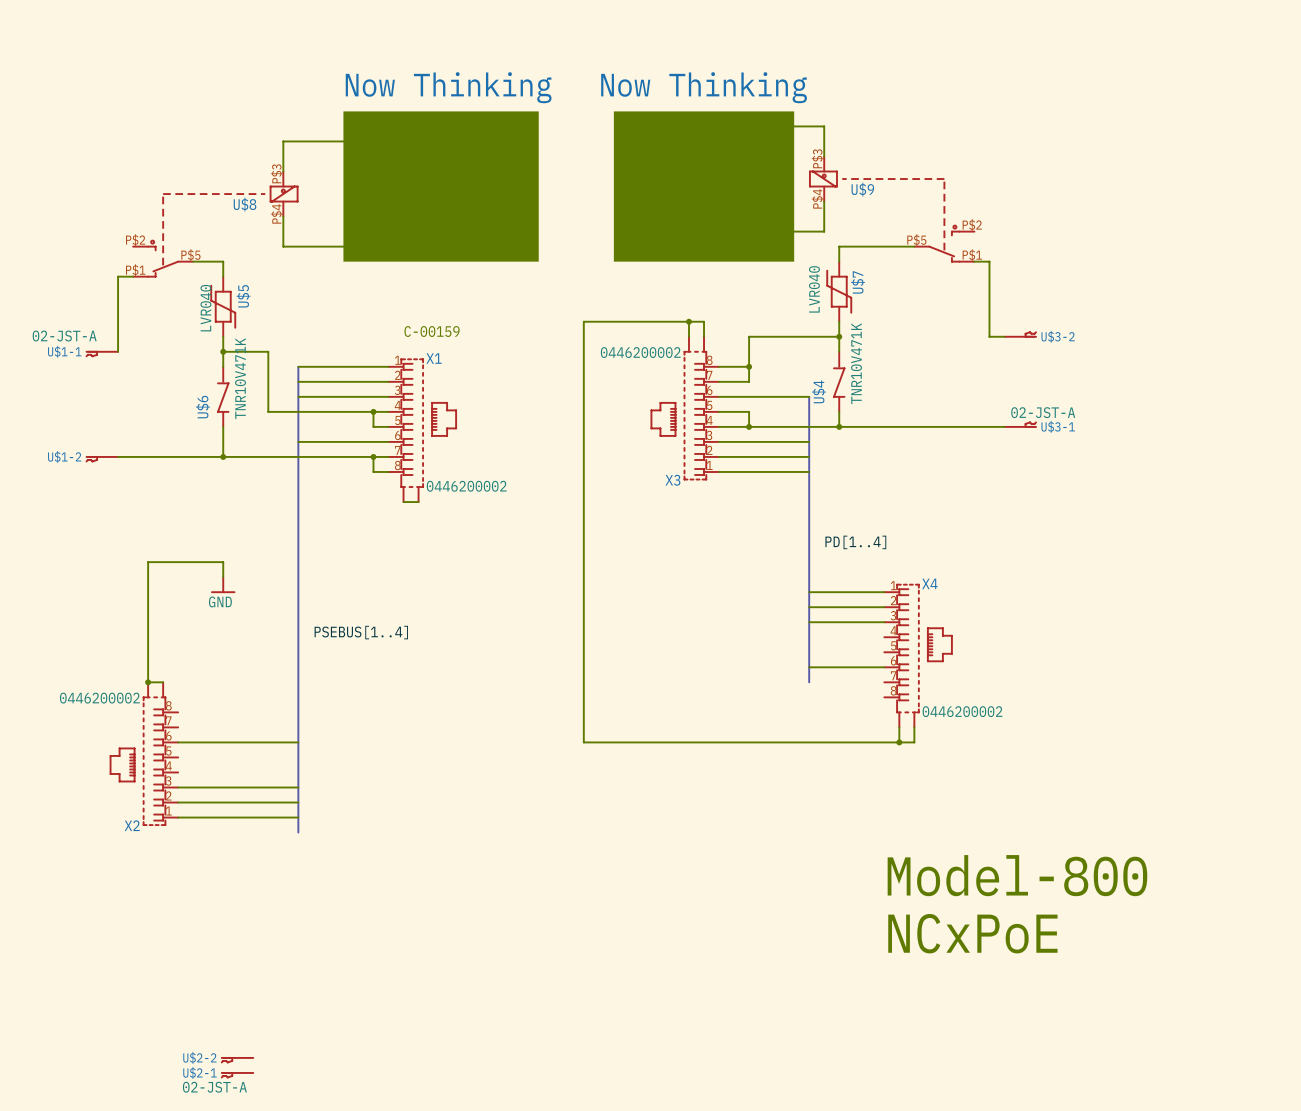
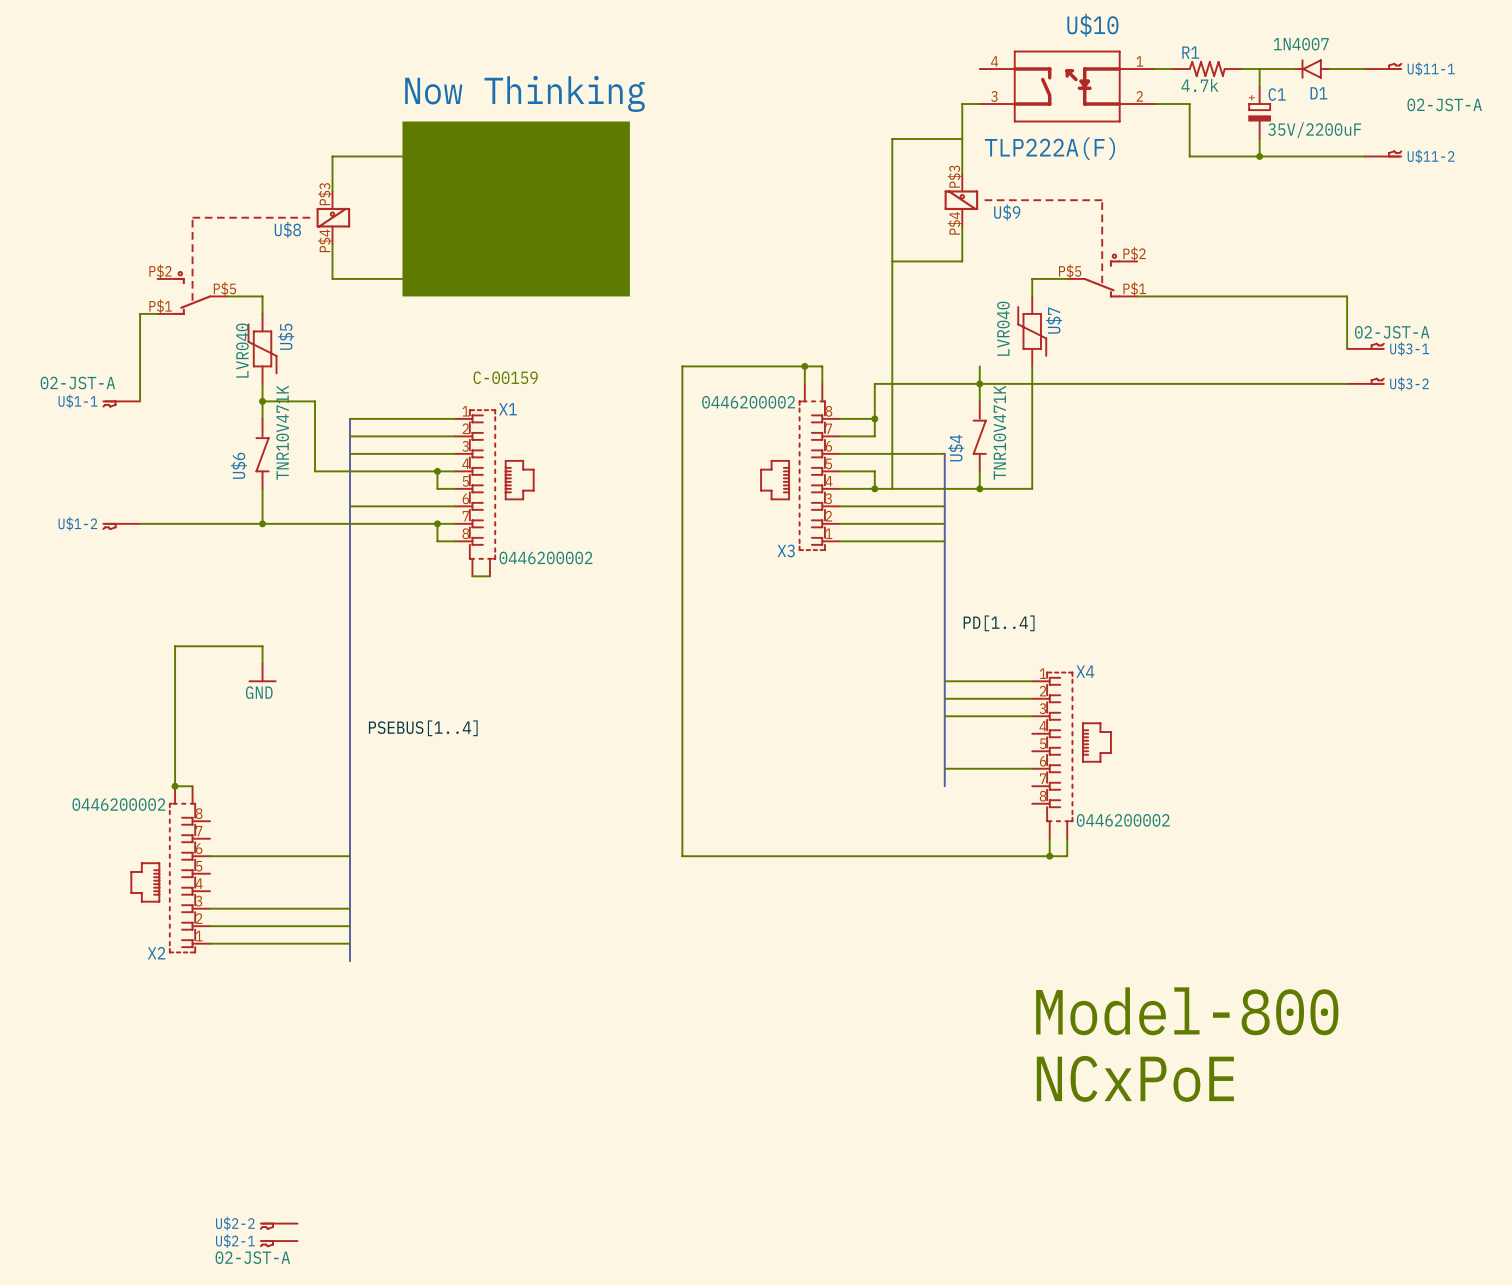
U$11-1: none -> 02-JST-A (1383, 66)
wire: none -> (1154, 69) (1172, 69)
R1: none -> 4.7k (1207, 69)
wire: none -> (1242, 69) (1294, 69)
wire: none -> (1259, 69) (1259, 86)
D1: none -> 1N4007 (1312, 69)
wire: none -> (1329, 69) (1364, 69)
U$10: none -> (1067, 86)
text: Now Thinking (704, 87) -> none
wire: none -> (979, 104) (962, 104) (962, 139)
wire: none -> (1154, 104) (1189, 104) (1189, 156) (1364, 156)
C1: none -> 35V/2200uF (1259, 112)
drawing: [613, 111, 795, 262] -> none
wire: none -> (1259, 139) (1259, 156)
U$11-2: none -> (1383, 153)
junction: none -> (1259, 156)
wire: none -> (892, 261) (892, 488)
wire: (884, 246) (839, 246) (839, 261) -> (1032, 278) (1032, 296)
wire: (989, 261) (989, 336) -> (1154, 296) (1347, 296) (1347, 348)
U$7 position: (839, 291) -> (1032, 331)
U$3-2 position: (1020, 334) -> (1365, 381)
wire: none -> (979, 383) (1154, 383)
wire: none -> (1172, 383) (1347, 383)
U$4 value position: TNR10V471K (856, 363) -> TNR10V471K (999, 432)
U$3-1 position: (1020, 424) -> (1365, 346)
wire: (884, 426) (1004, 426) -> (1032, 488) (1032, 366)

